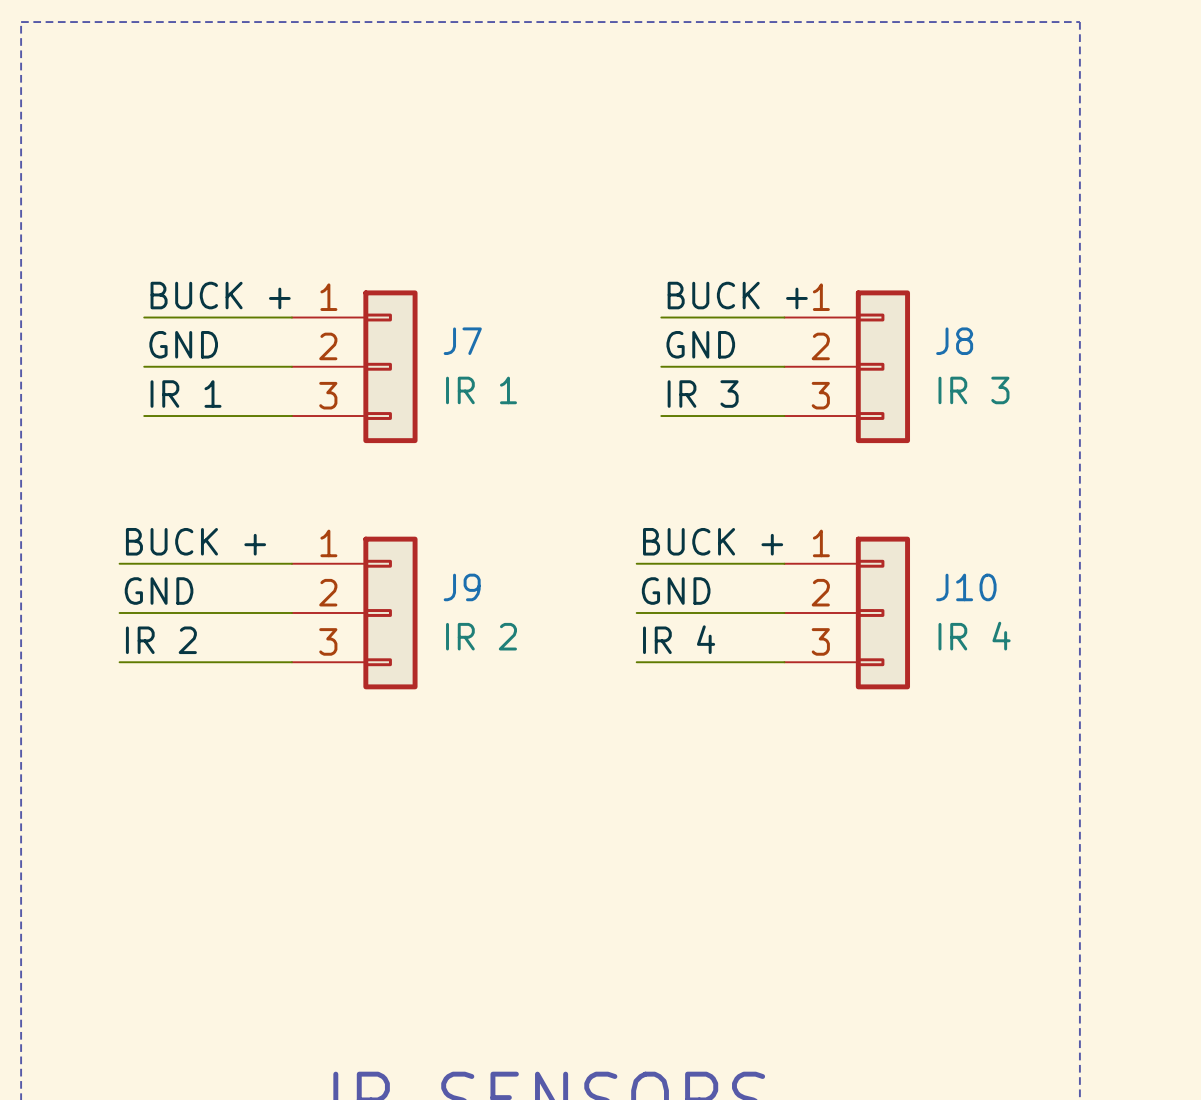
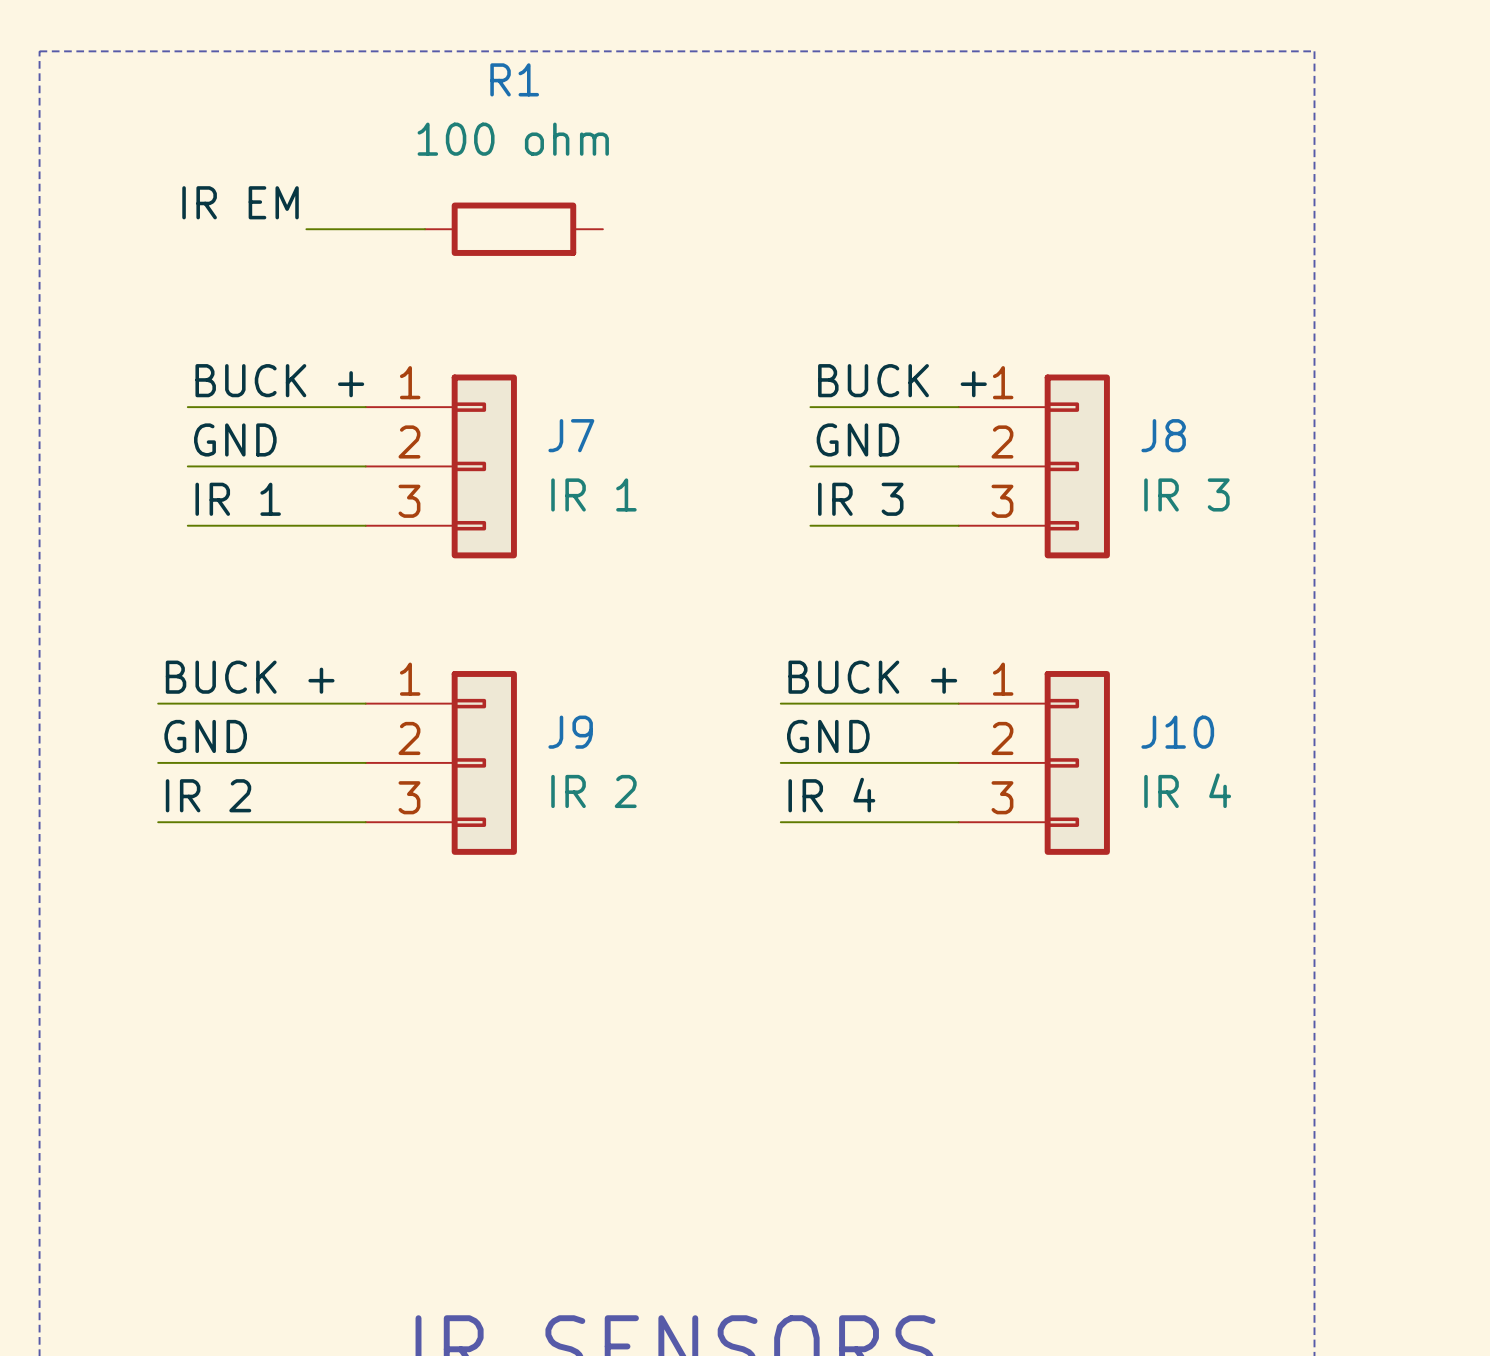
label: none -> IR EM (240, 202)
wire: none -> (306, 229) (425, 229)
R1: none -> 100 ohm (513, 229)

